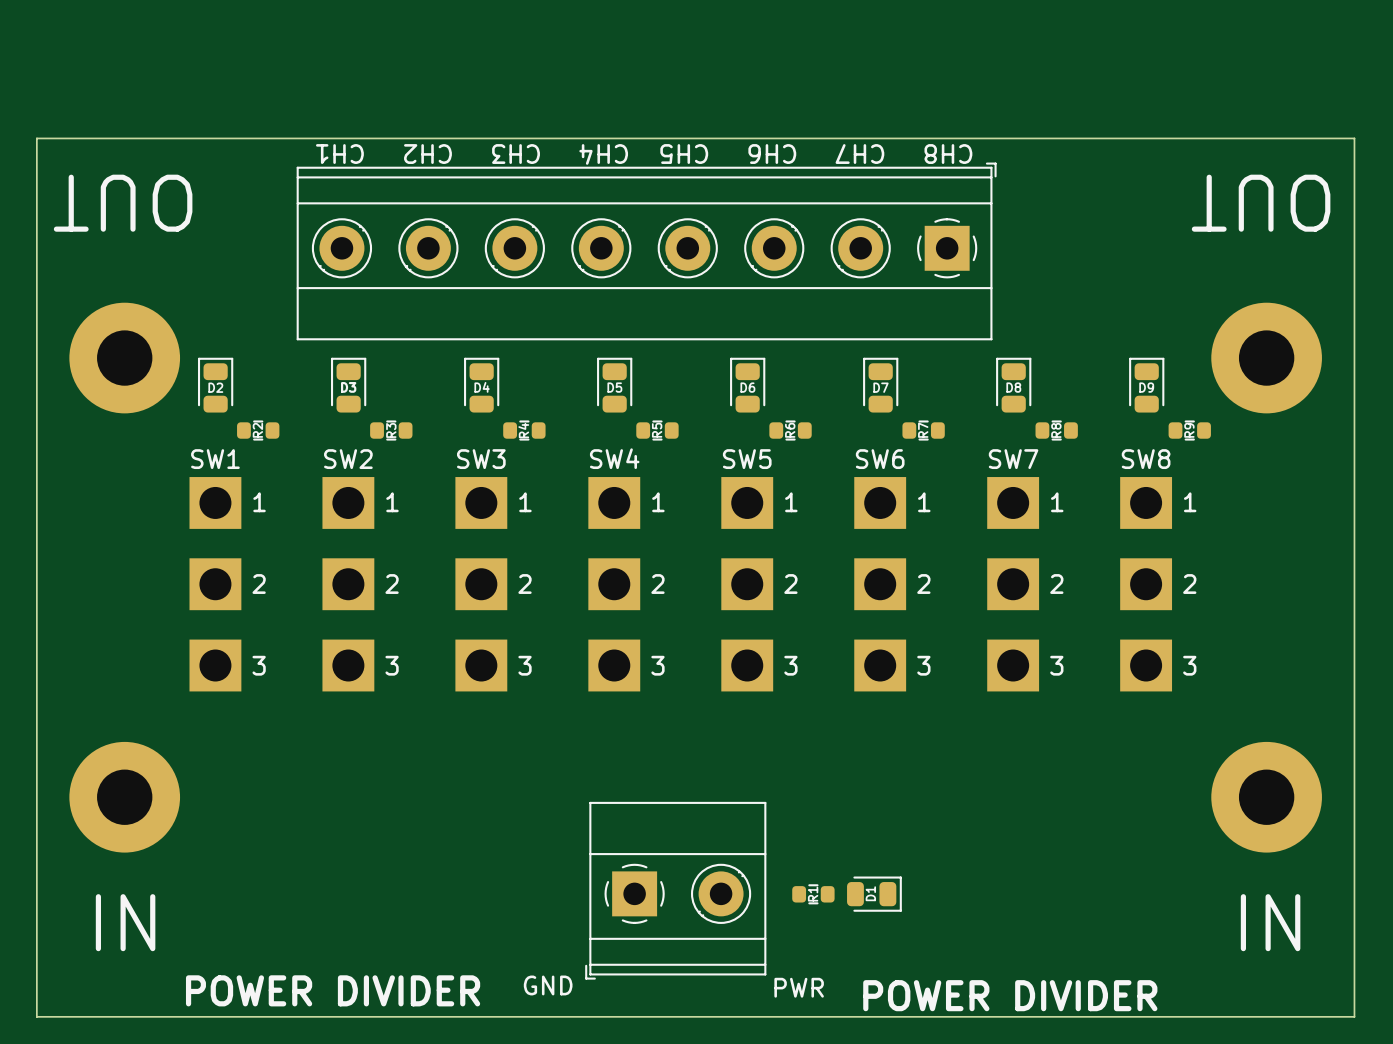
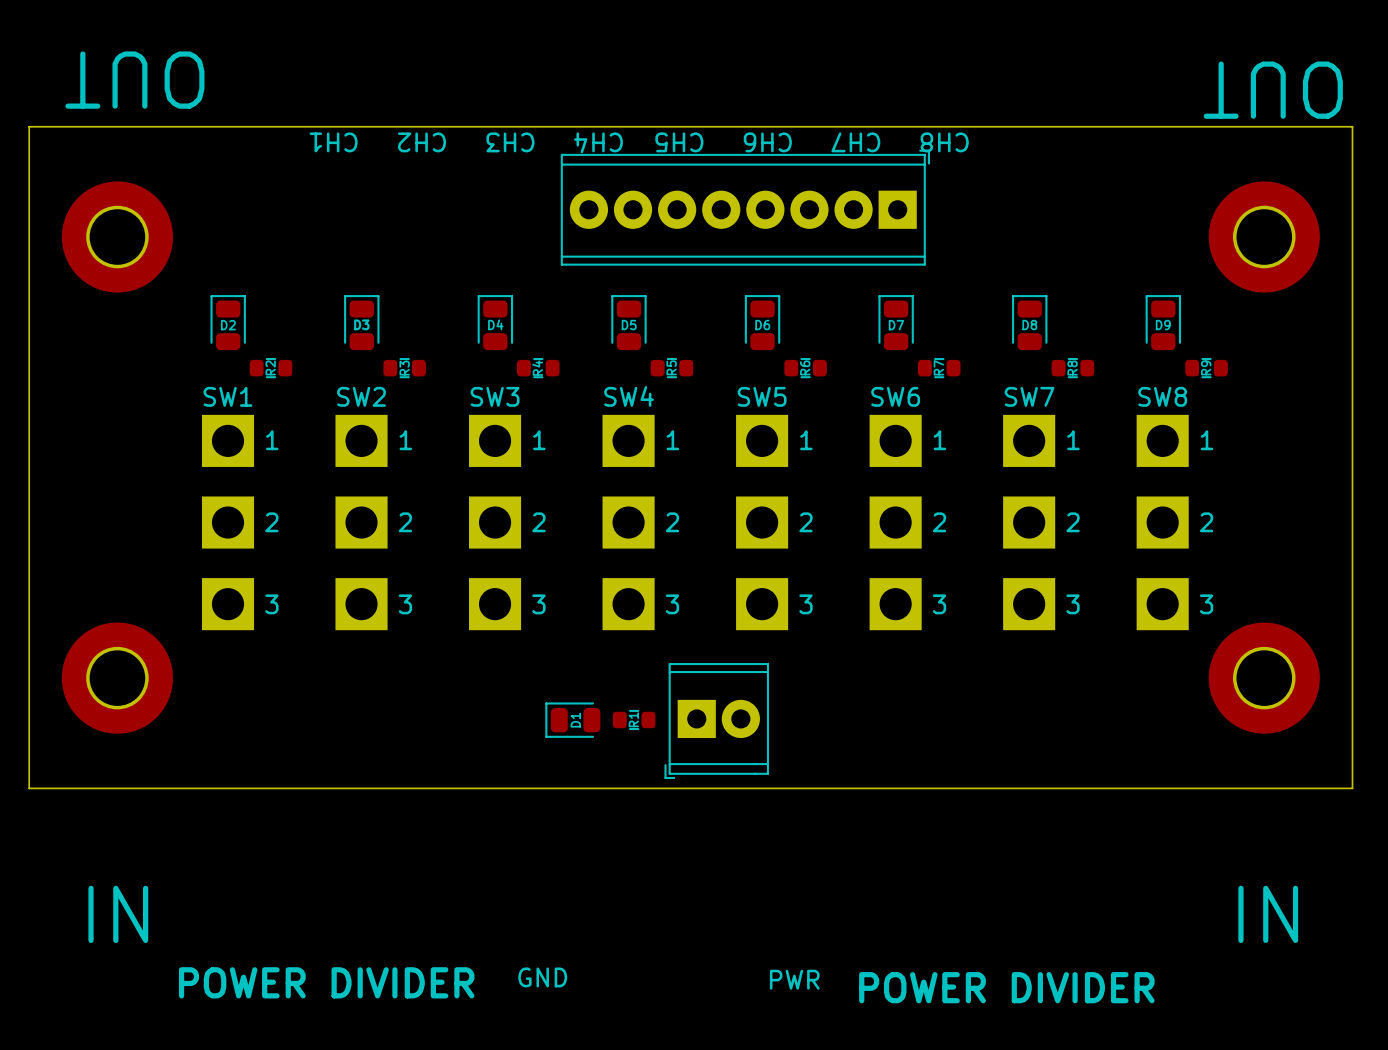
text position: OUT (123, 203) -> OUT (134, 80)
text position: OUT (1261, 203) -> OUT (1273, 90)
part: none -> (745, 207)
part: (646, 251) -> none
part position: (124, 358) -> (117, 237)
part position: (1266, 358) -> (1264, 237)
D2 position: (215, 385) -> (228, 322)
D3 position: (348, 385) -> (361, 322)
D4 position: (481, 385) -> (495, 322)
D5 position: (614, 385) -> (628, 322)
D6 position: (747, 385) -> (762, 322)
D7 position: (880, 385) -> (896, 322)
D8 position: (1013, 385) -> (1029, 322)
D9 position: (1146, 385) -> (1163, 322)
R2 position: (258, 430) -> (270, 368)
R3 position: (391, 430) -> (404, 368)
R4 position: (524, 430) -> (538, 368)
R5 position: (657, 430) -> (671, 368)
R6 position: (790, 430) -> (805, 368)
R7 position: (923, 430) -> (939, 368)
R8 position: (1056, 430) -> (1072, 368)
R9 position: (1189, 430) -> (1206, 368)
SW1 position: (215, 584) -> (228, 522)
SW2 position: (348, 584) -> (361, 522)
SW3 position: (481, 584) -> (495, 522)
SW4 position: (614, 584) -> (628, 522)
SW5 position: (747, 584) -> (762, 522)
SW6 position: (880, 584) -> (895, 522)
SW7 position: (1013, 584) -> (1029, 522)
SW8 position: (1146, 584) -> (1162, 522)
part: none -> (716, 721)
board edge: (36, 797) (36, 1016) (1354, 1016) (1354, 797) -> (29, 788) (1352, 788)
part position: (124, 797) -> (117, 678)
part position: (1266, 797) -> (1264, 678)
part: (675, 890) -> none
R1 position: (813, 894) -> (634, 719)
D1 rotation: 0° (874, 894) -> 180° (572, 720)
D1 position: (874, 894) -> (572, 720)

